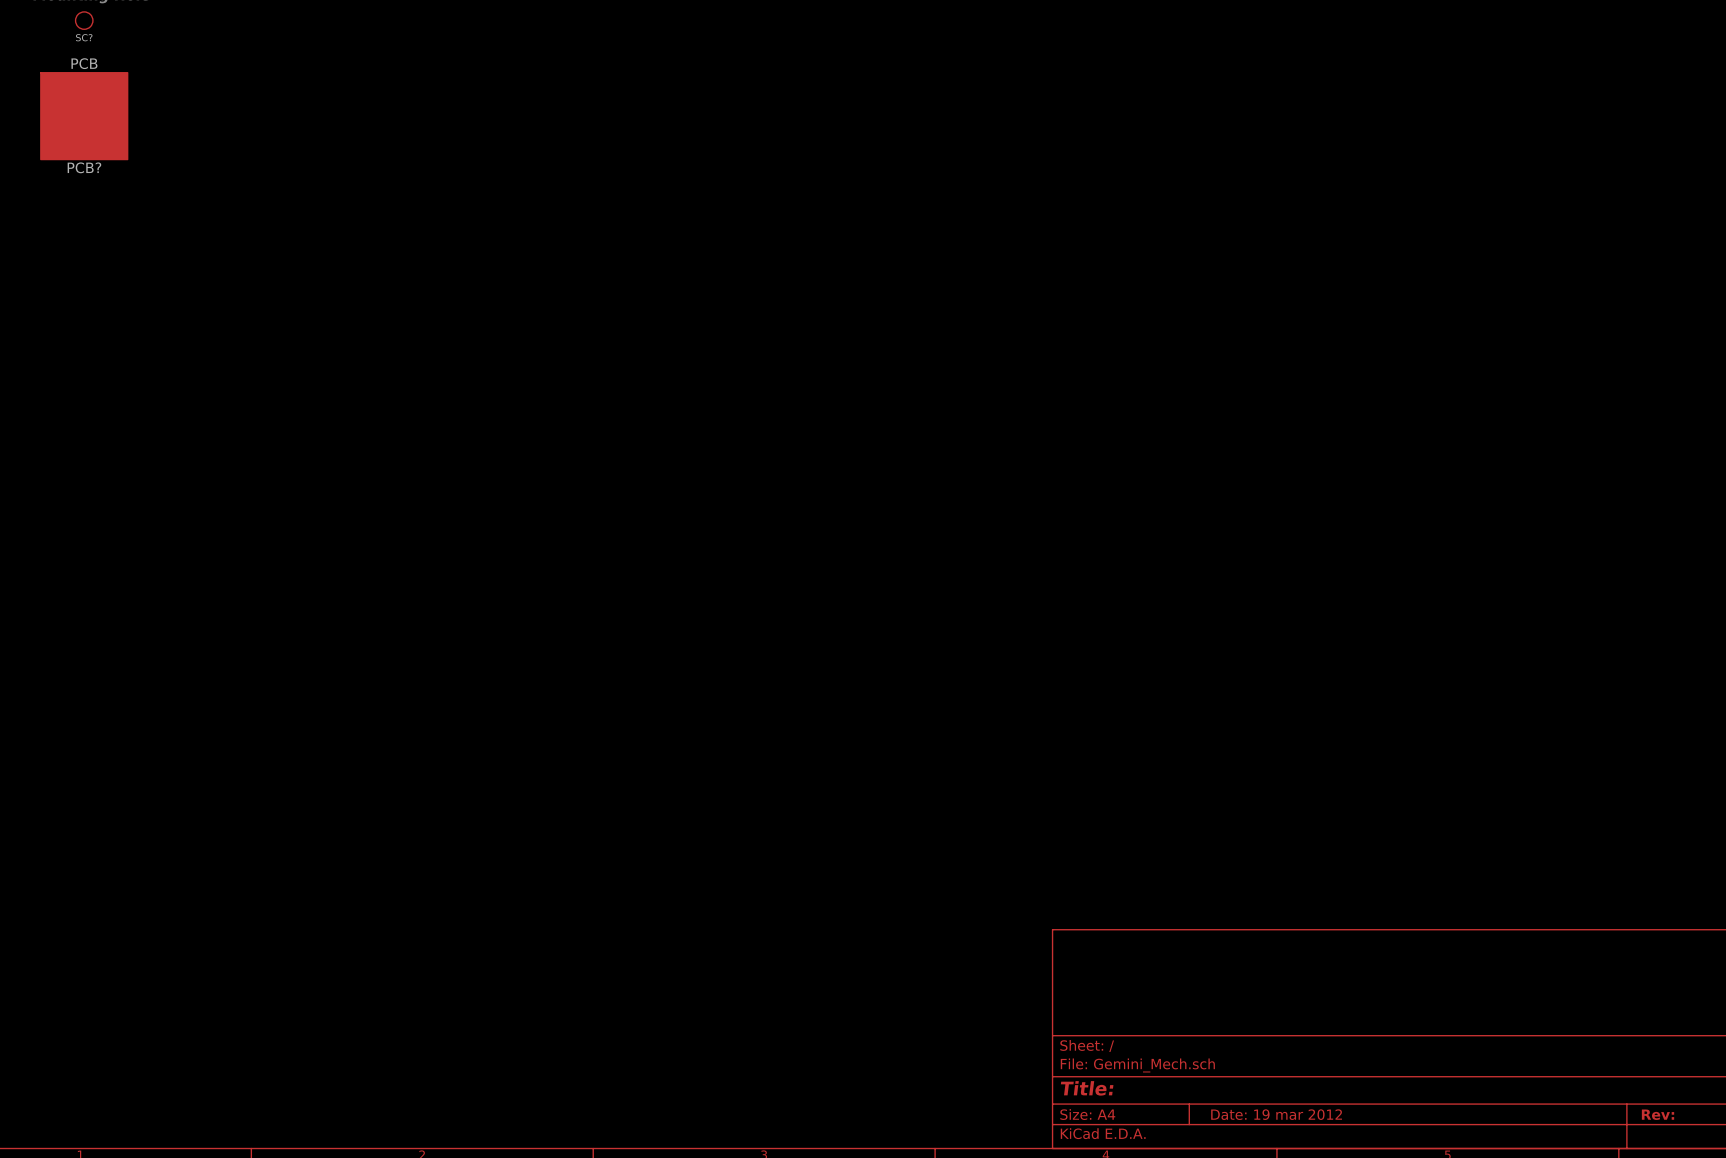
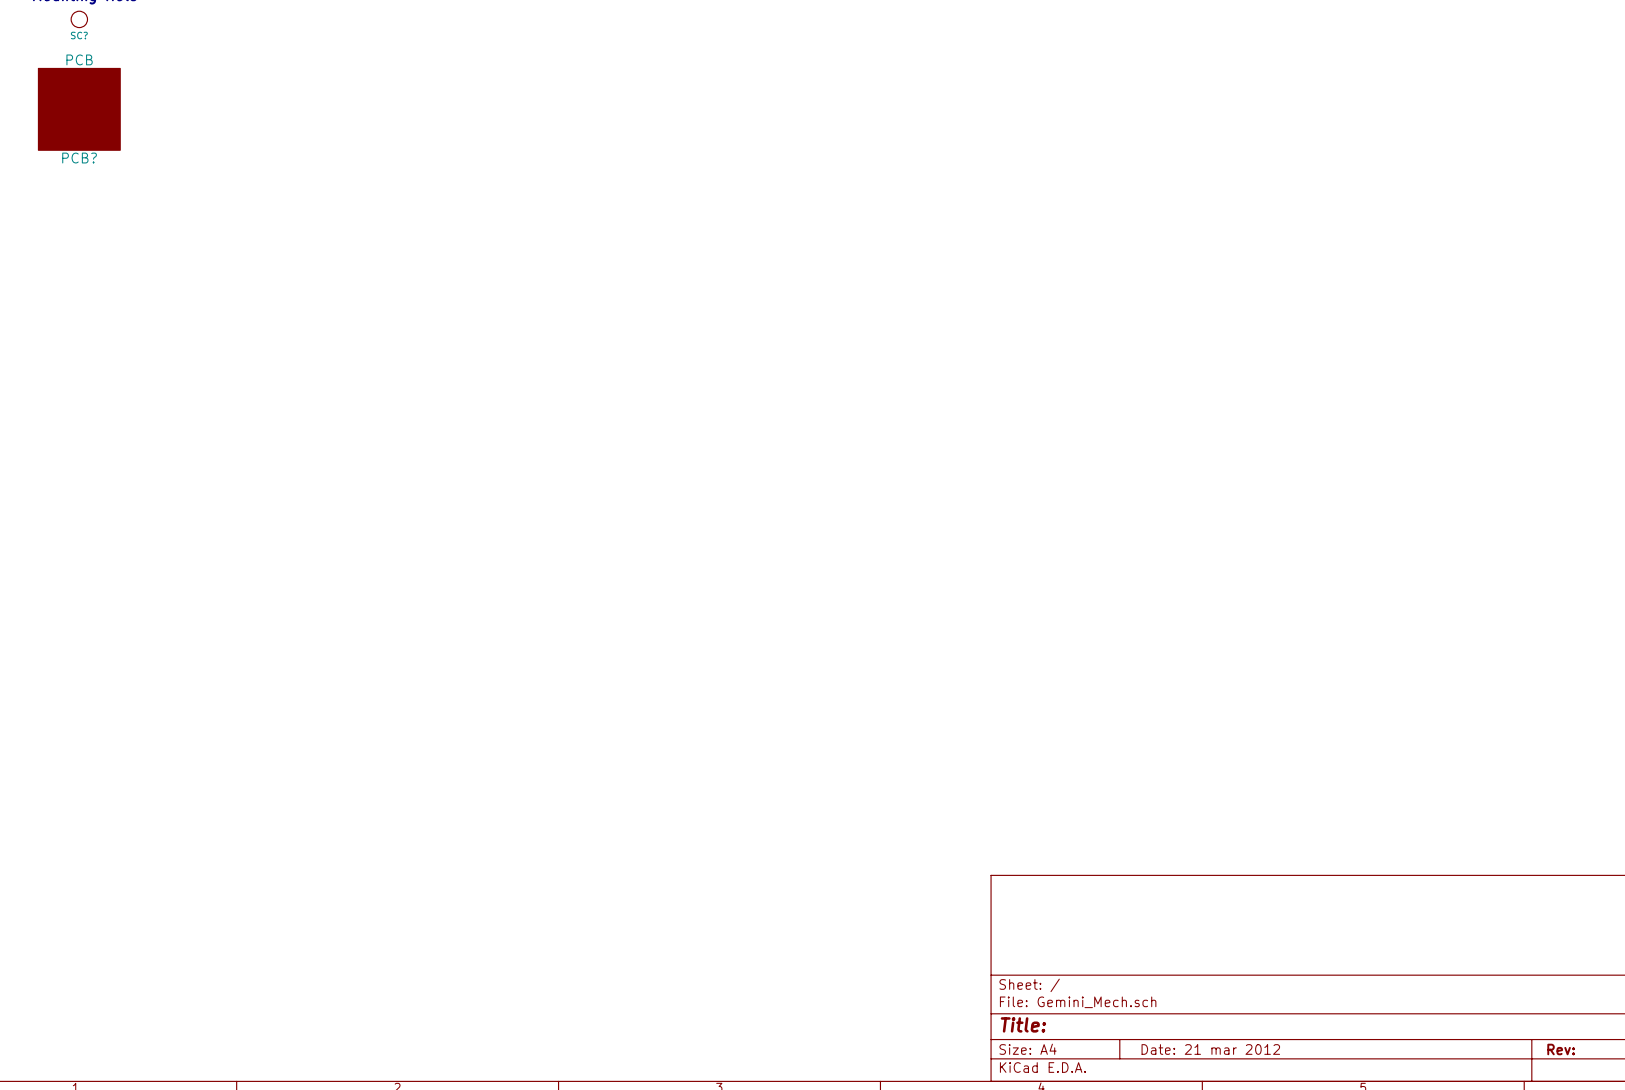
title block: Date: 19 mar 2012 (1276, 1114) -> Date: 21 mar 2012 (1210, 1049)

